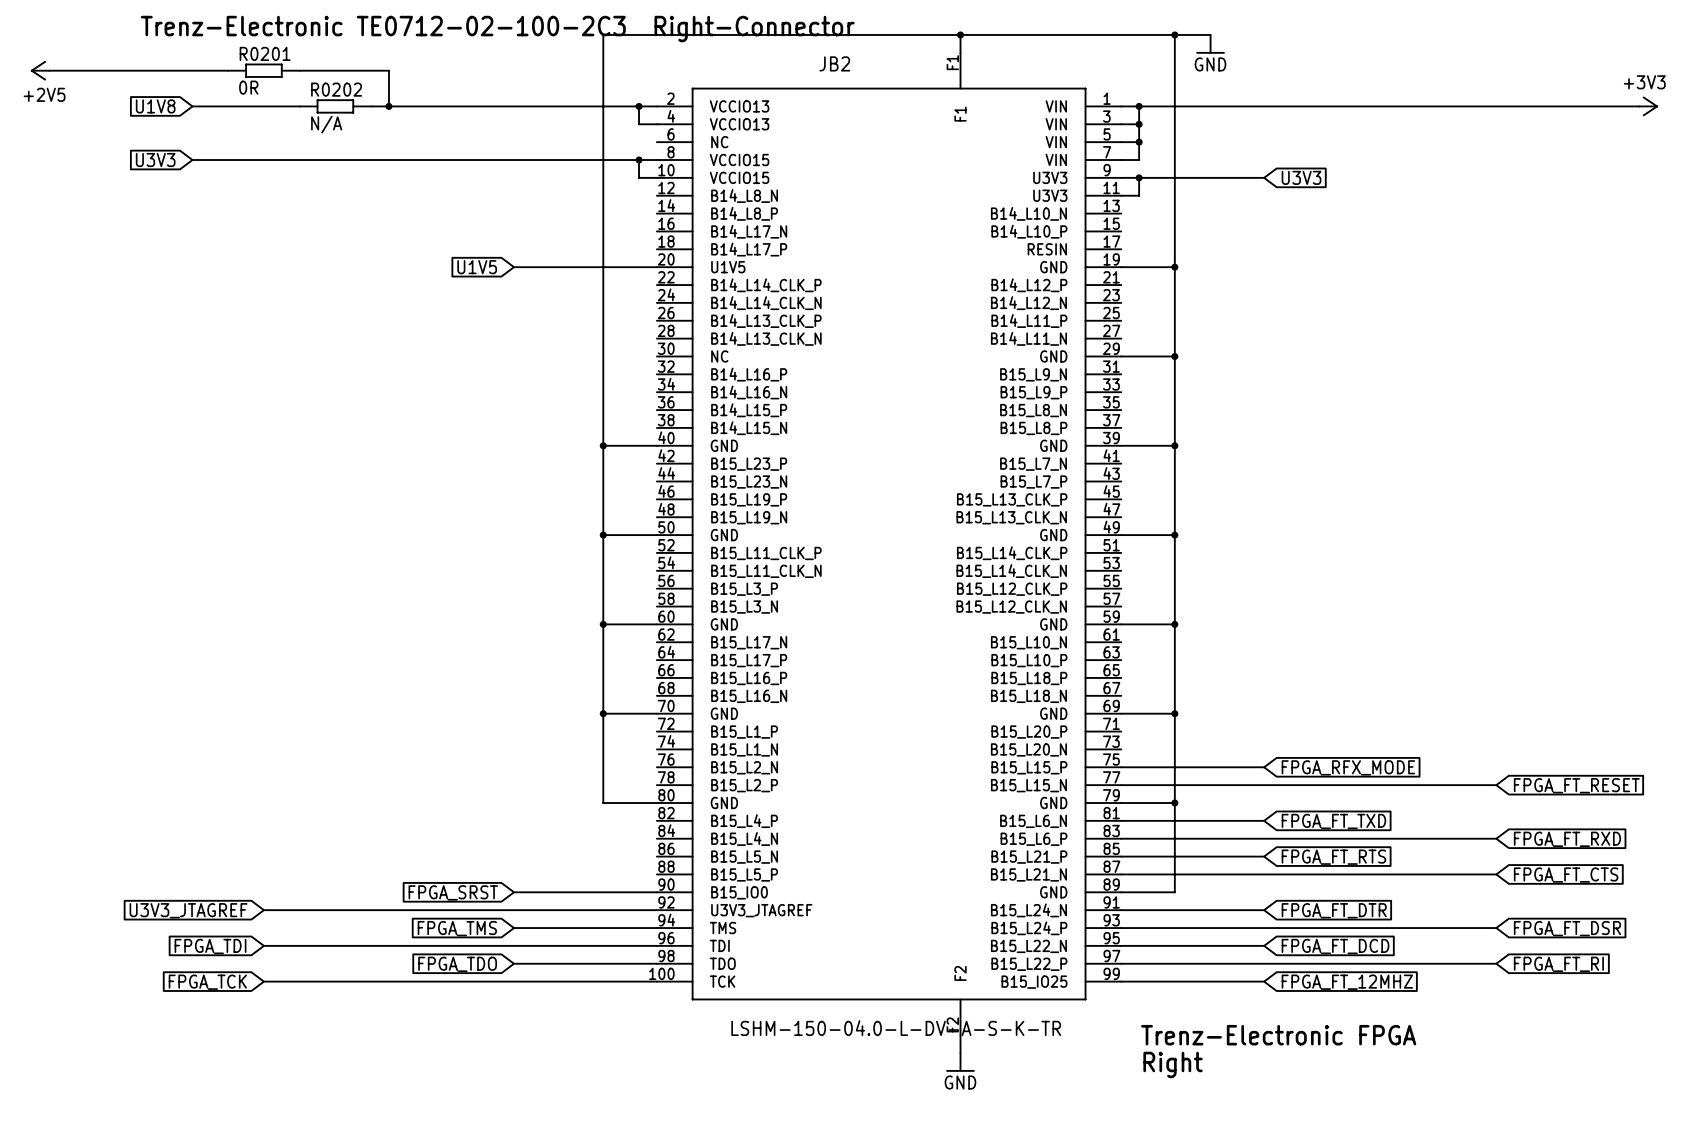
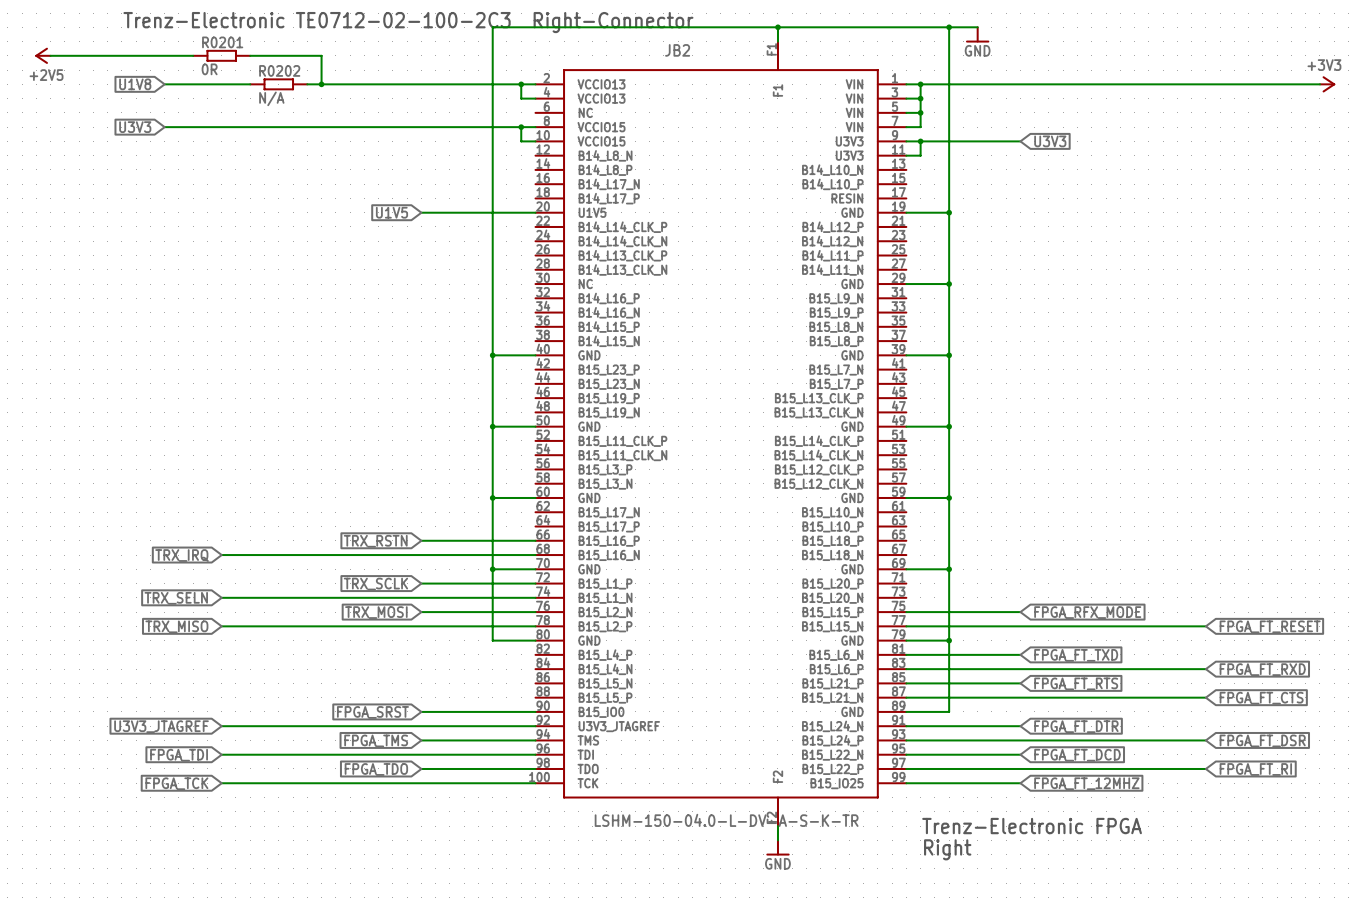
wire: none -> (421, 540) (535, 540)
global label: none -> TRX_RSTN (375, 541)
wire: none -> (221, 555) (535, 555)
global label: none -> TRX_IRQ (182, 555)
wire: none -> (421, 583) (535, 583)
global label: none -> TRX_SCLK (375, 584)
wire: none -> (221, 597) (535, 597)
global label: none -> TRX_SELN (176, 598)
global label: none -> TRX_MOSI (376, 612)
wire: none -> (421, 612) (535, 612)
global label: none -> TRX_MISO (176, 626)
wire: none -> (221, 626) (535, 626)

